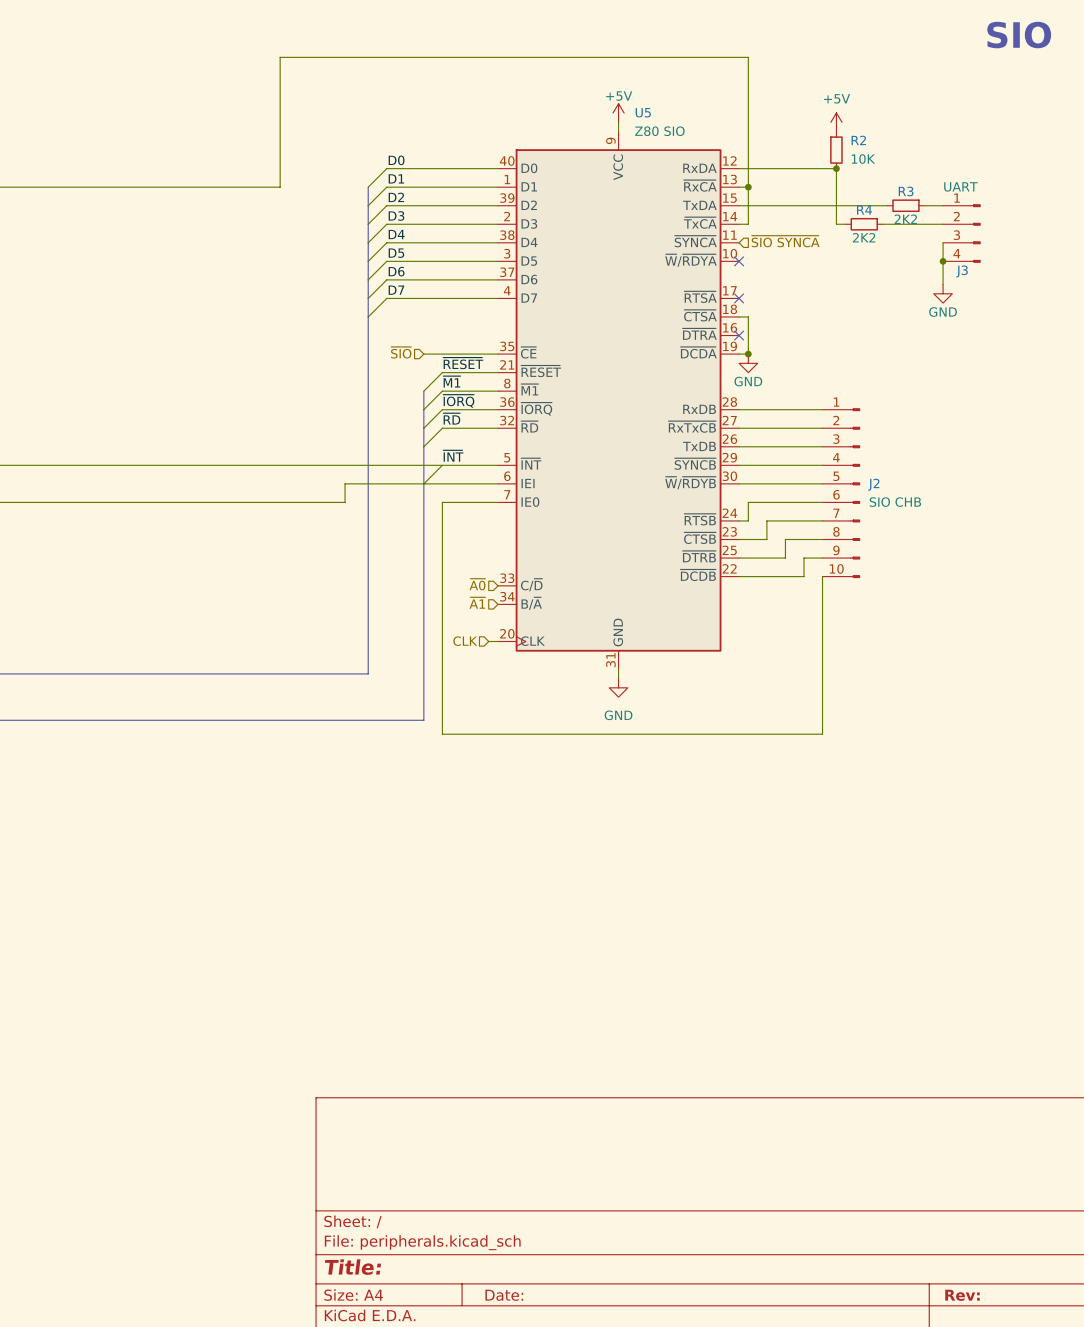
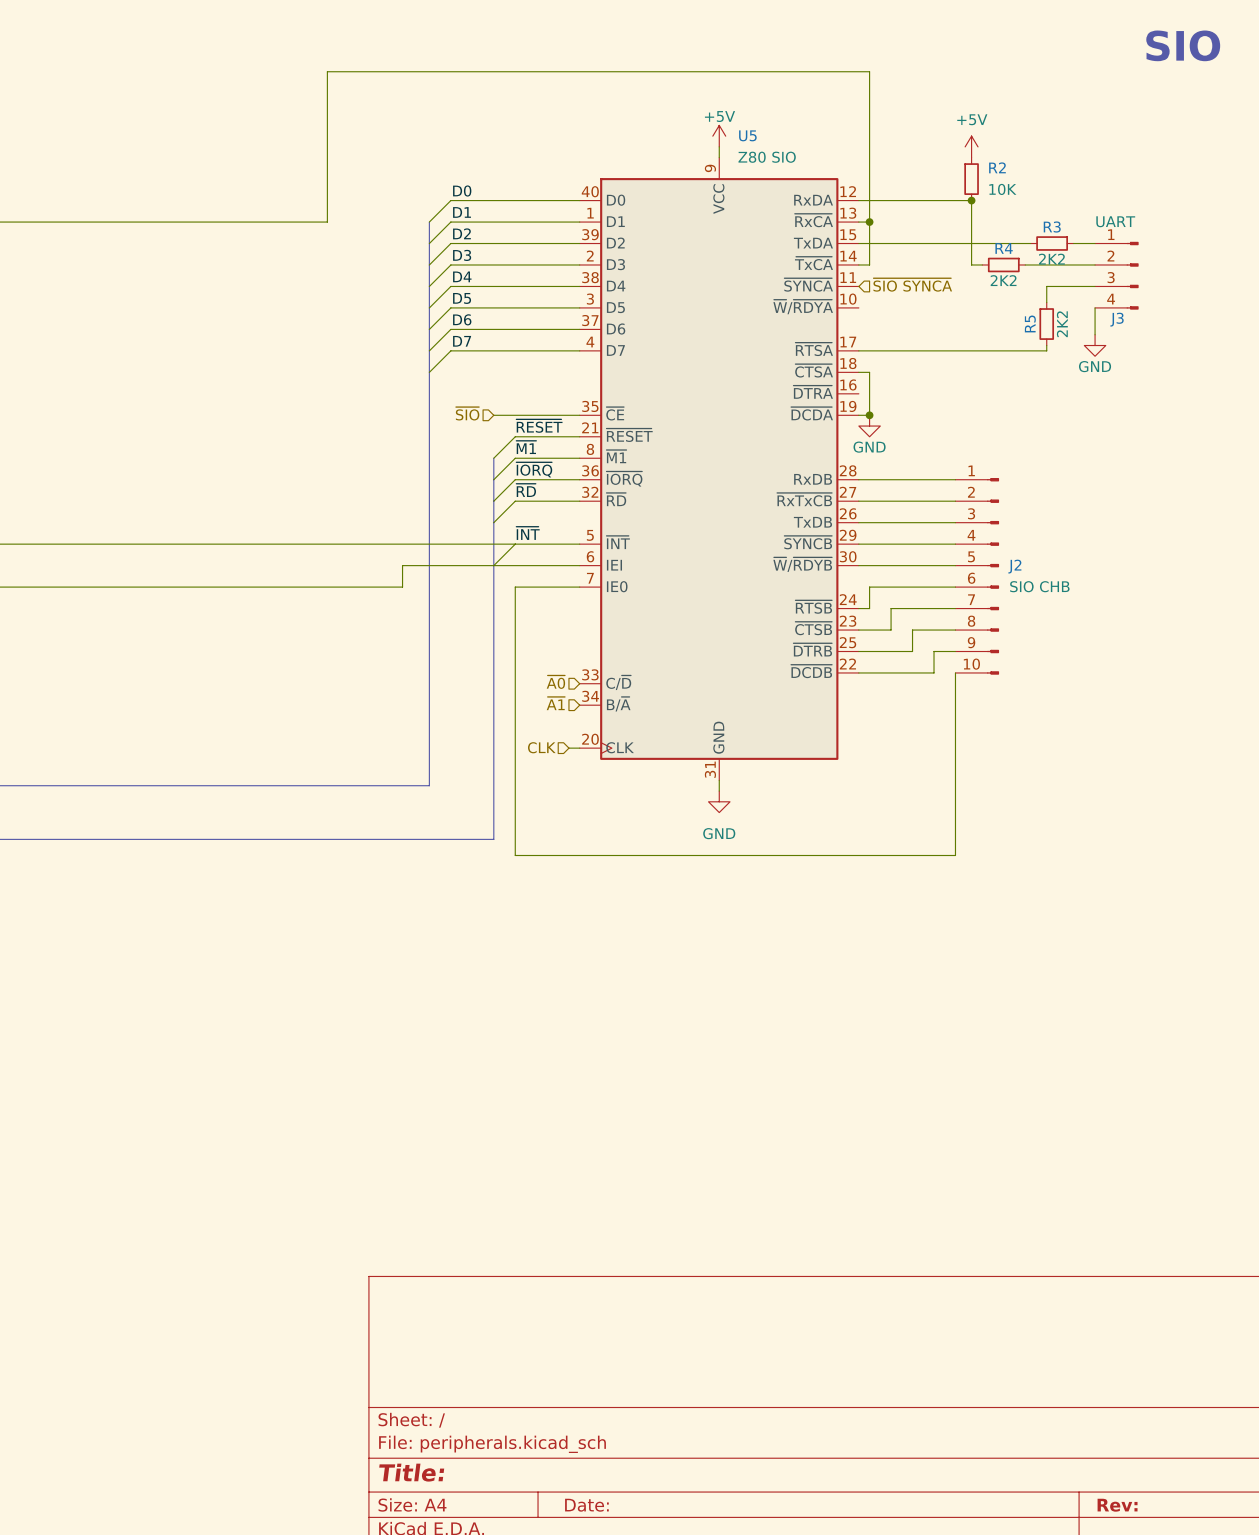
wire: (943, 242) (943, 261) -> (1095, 286) (1046, 286) (1046, 302)
no-connect mark: (739, 261) -> none
junction: (943, 261) -> none
R5: none -> 2K2 (1046, 324)
wire: none -> (1046, 345) (1046, 350) (858, 350)
no-connect mark: (739, 298) -> none
no-connect mark: (739, 335) -> none

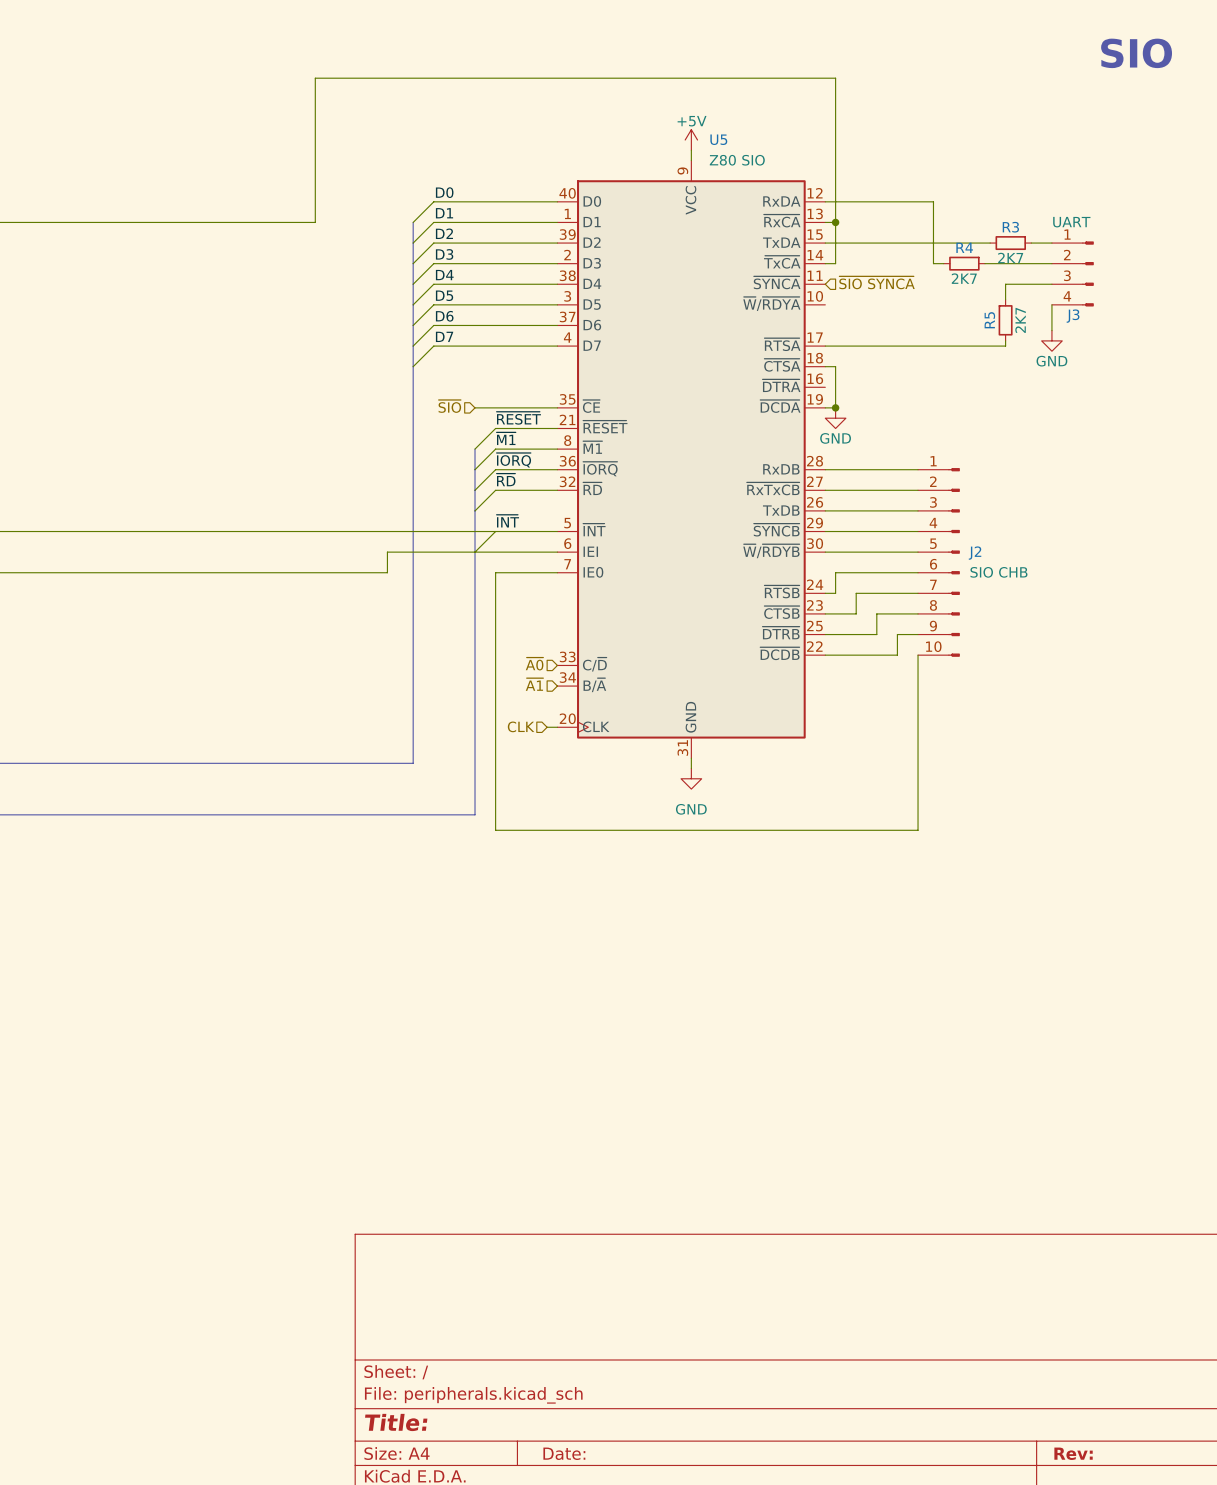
power symbol: +5V (971, 146) -> none
R2: 10K (971, 179) -> none
junction: (971, 200) -> none
R3 value: 2K2 (1051, 259) -> 2K7 (1010, 258)
R4 value: 2K2 (1003, 280) -> 2K7 (964, 278)
R5 value: 2K2 (1062, 324) -> 2K7 (1020, 320)

